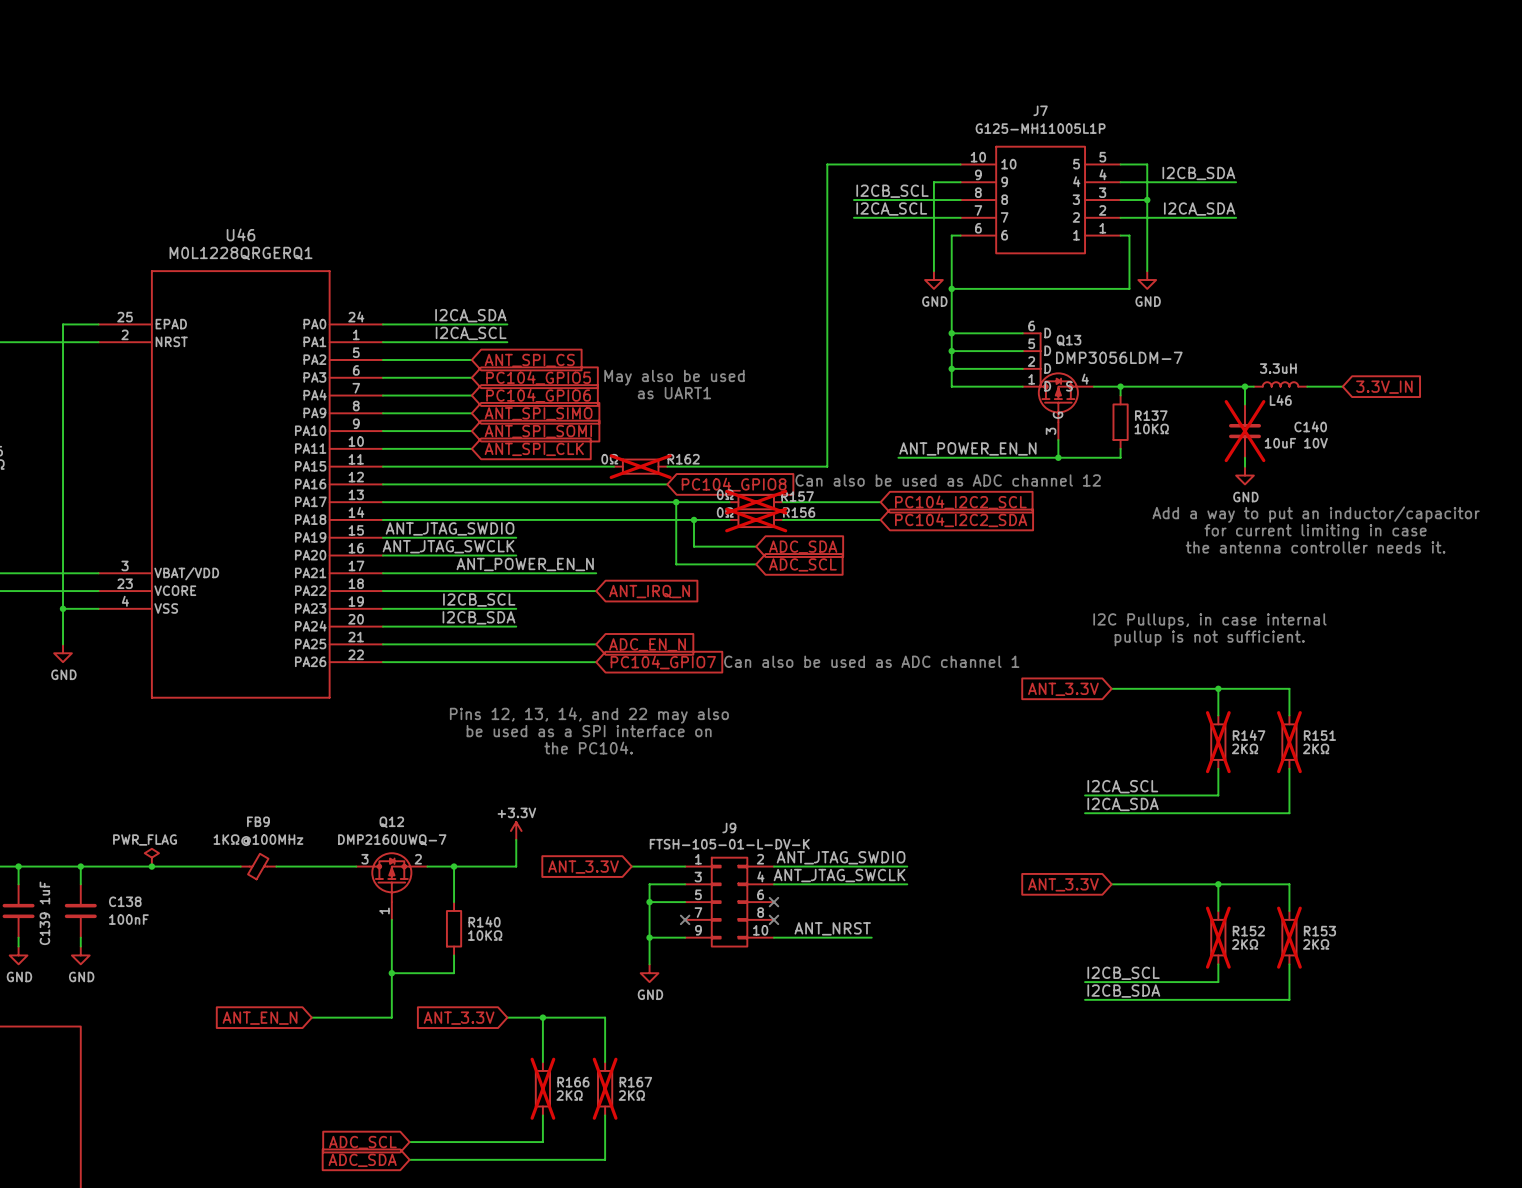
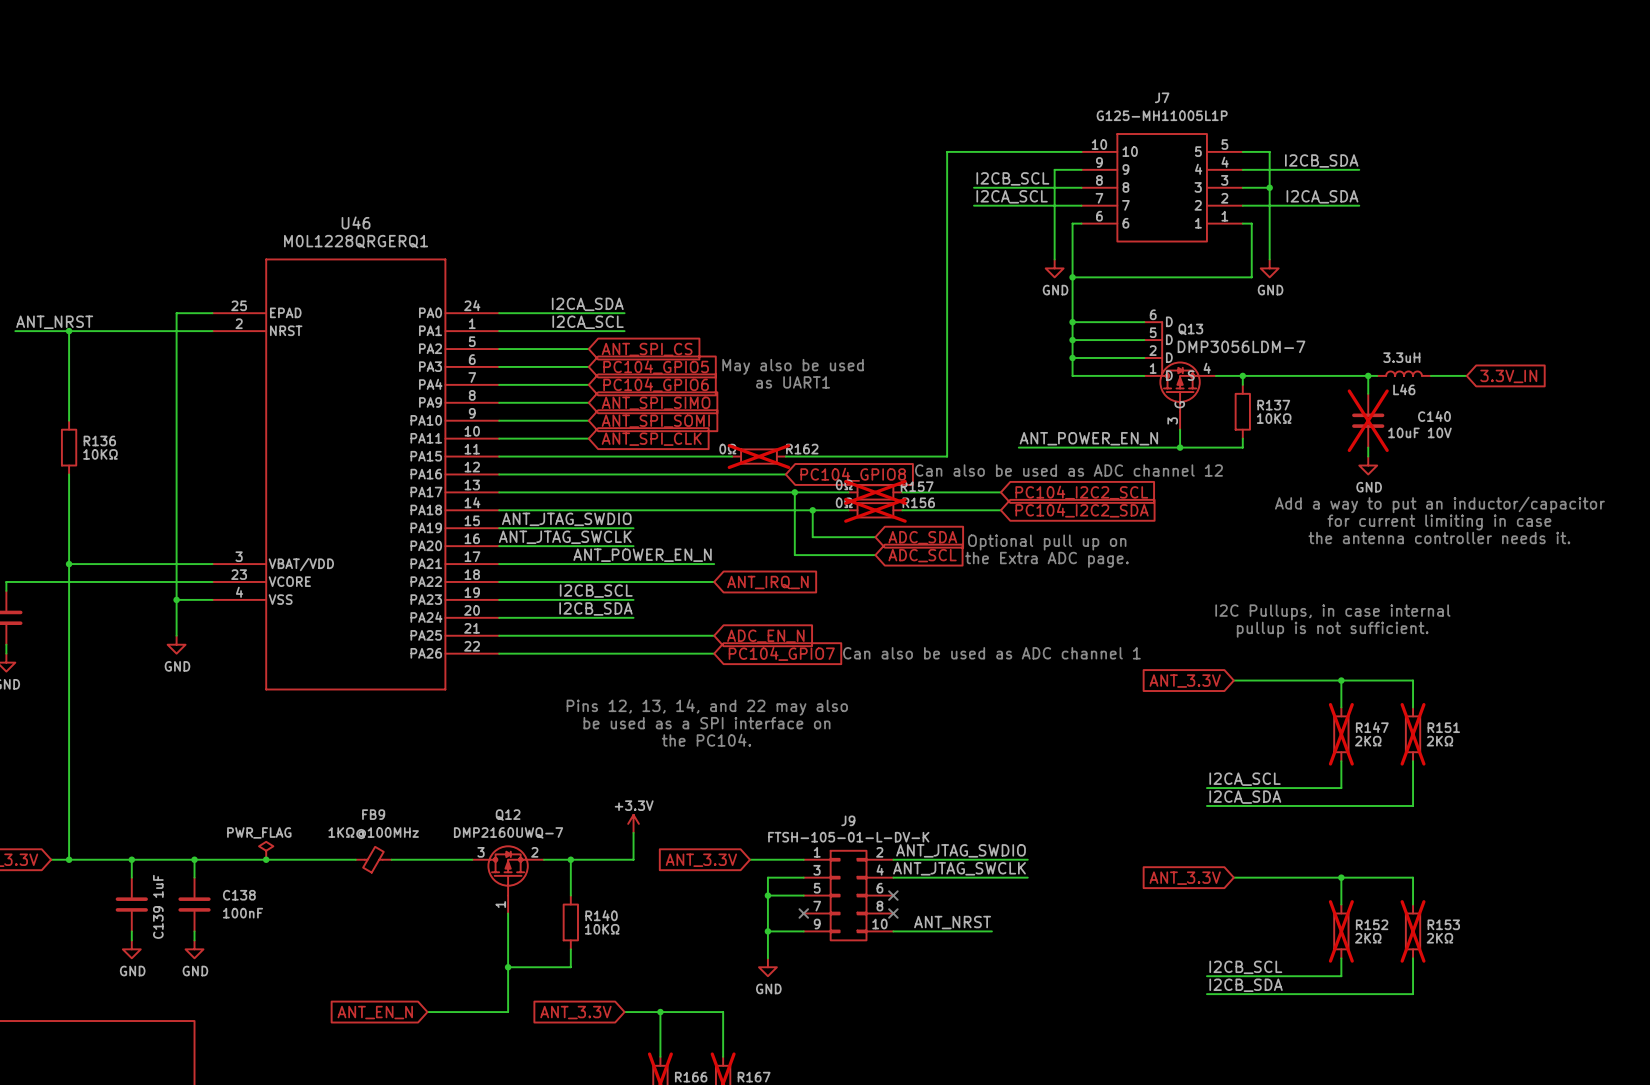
text: none -> Optional pull up on (1047, 542)
text: none -> the Extra ADC page. (1046, 559)

